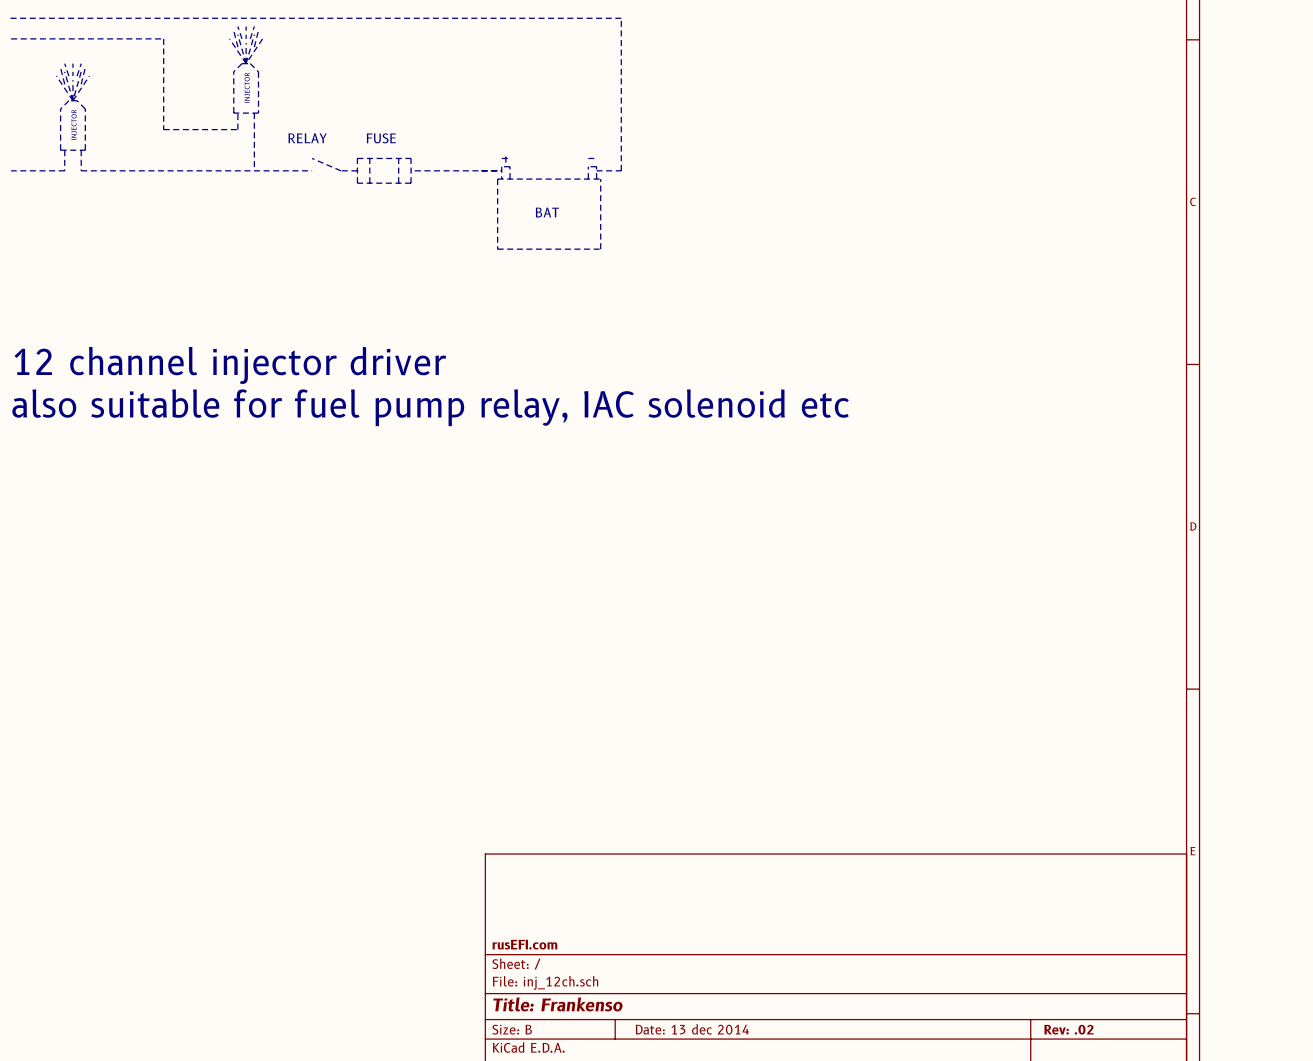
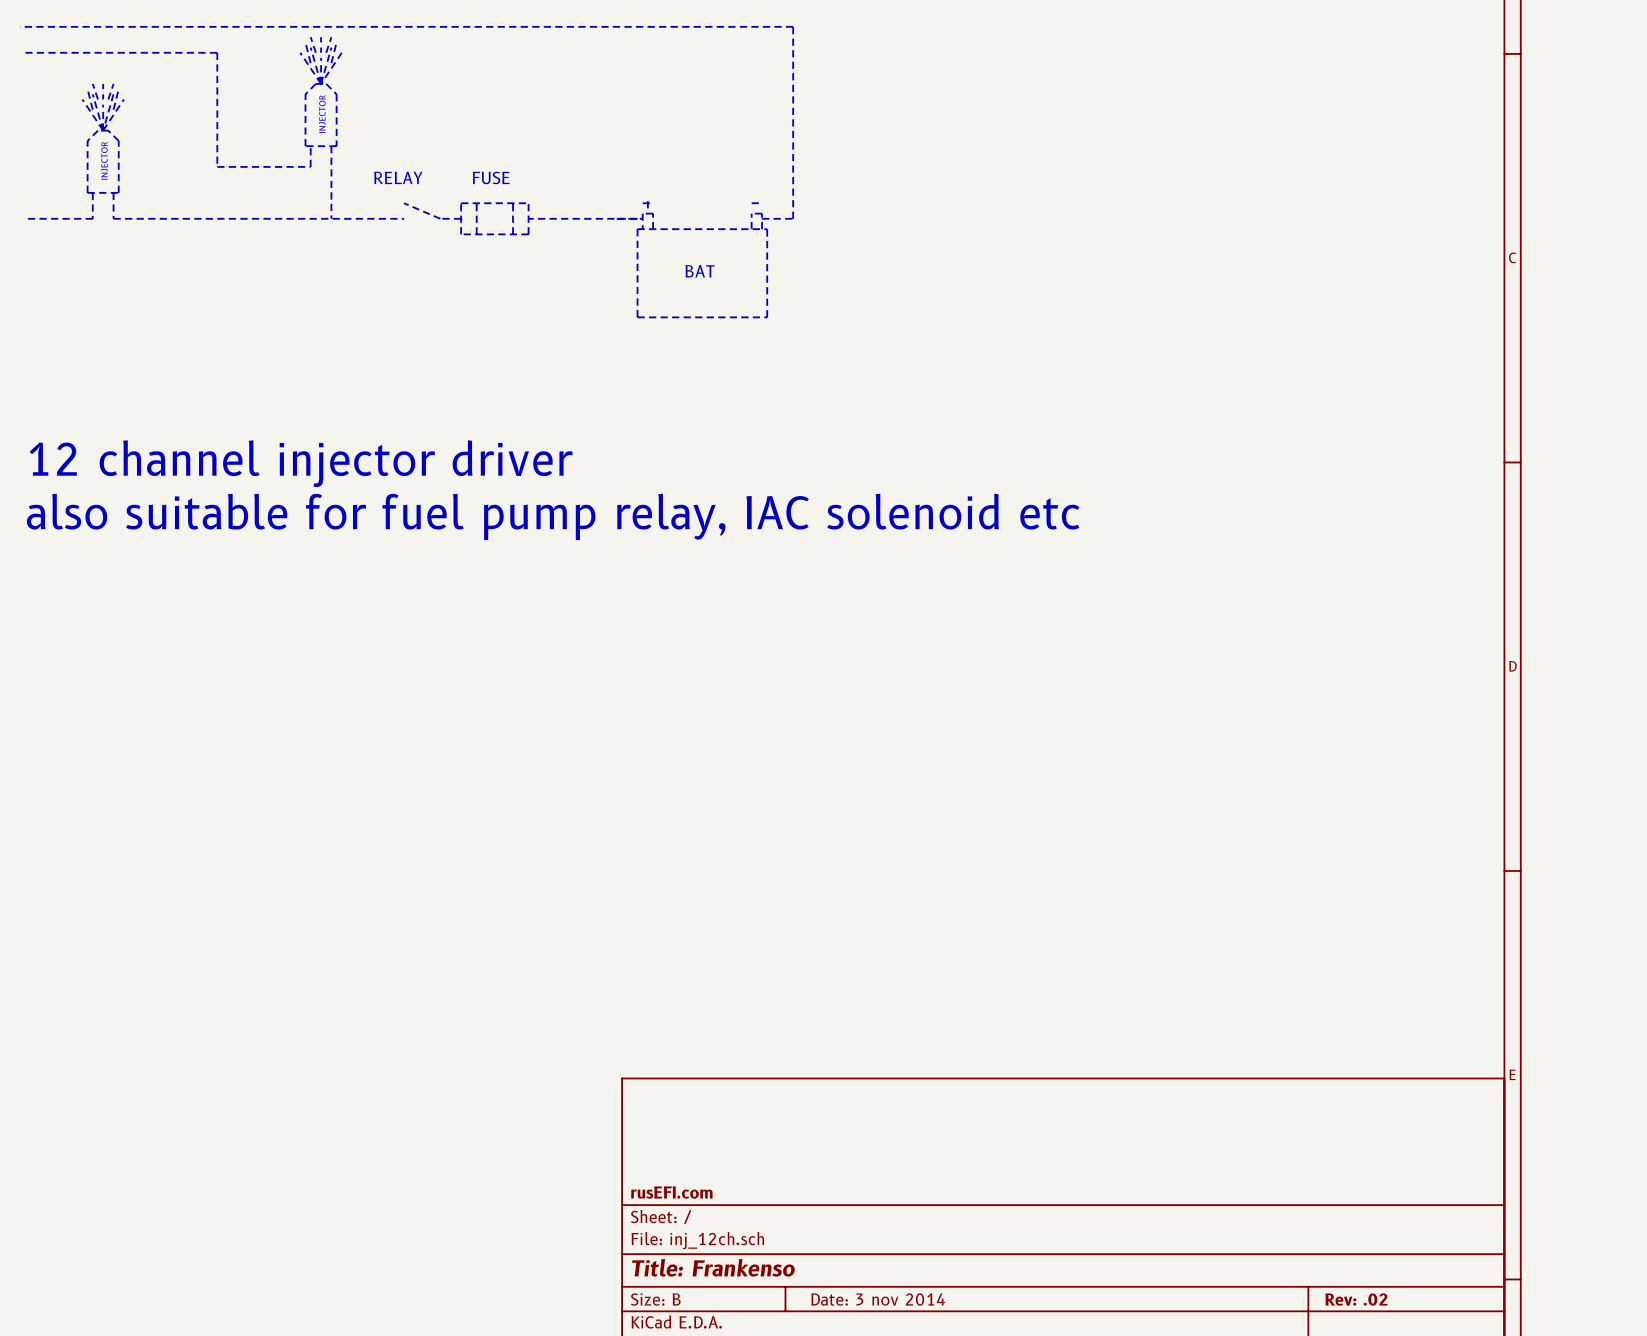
title block: Date: 13 dec 2014 (692, 1029) -> Date: 3 nov 2014 (878, 1299)

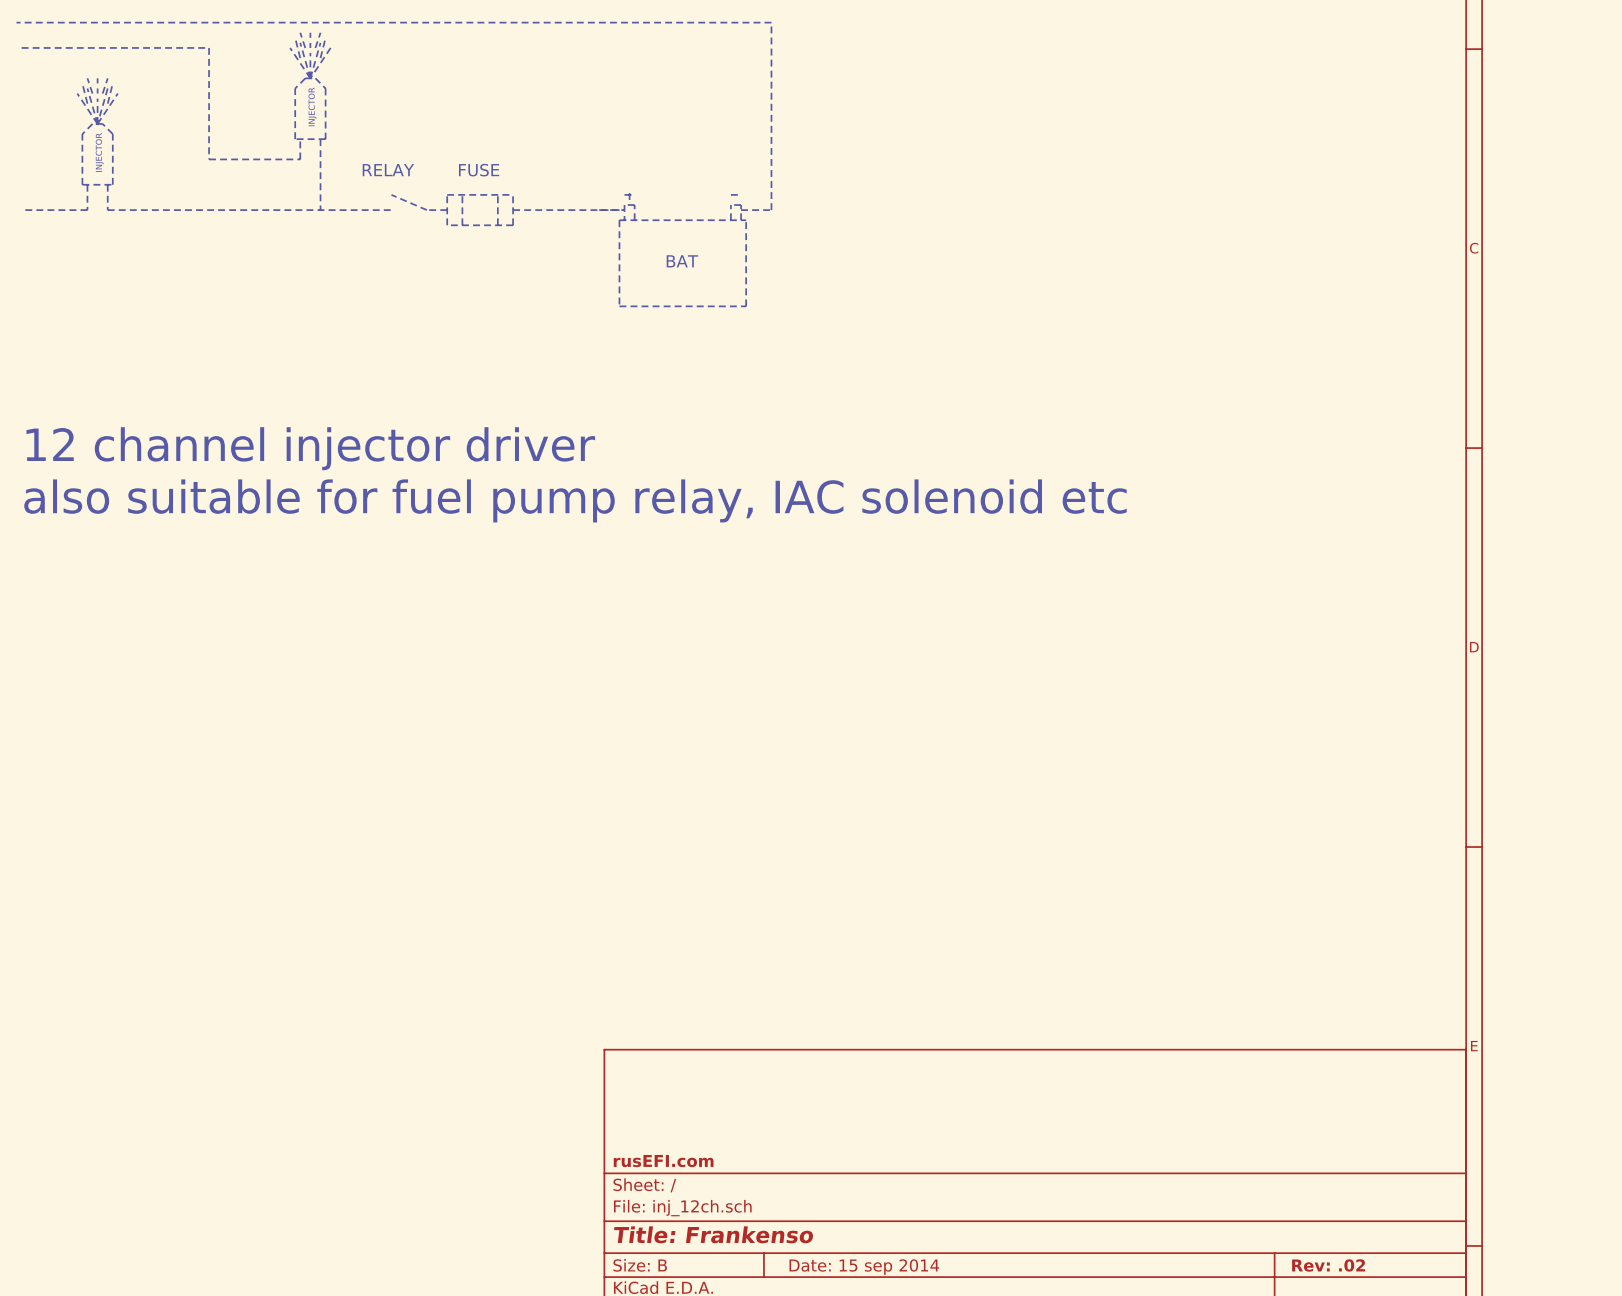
title block: Date: 3 nov 2014 (878, 1299) -> Date: 15 sep 2014 (864, 1267)

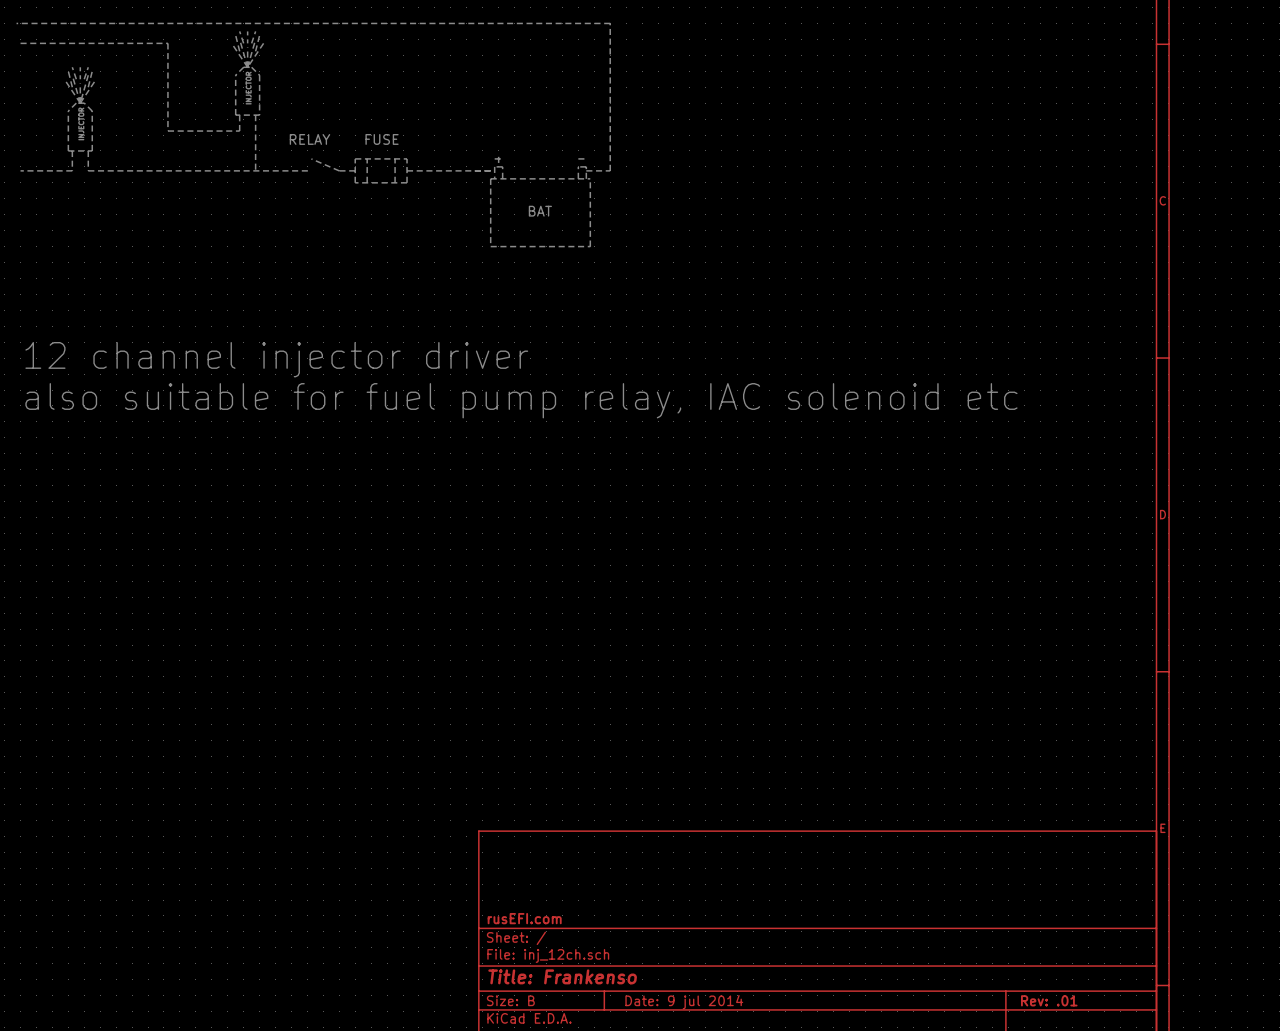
title block: Rev: .02 (1328, 1265) -> Rev: .01 (1049, 1000)
title block: Date: 15 sep 2014 (864, 1267) -> Date: 9 jul 2014 (684, 1002)

